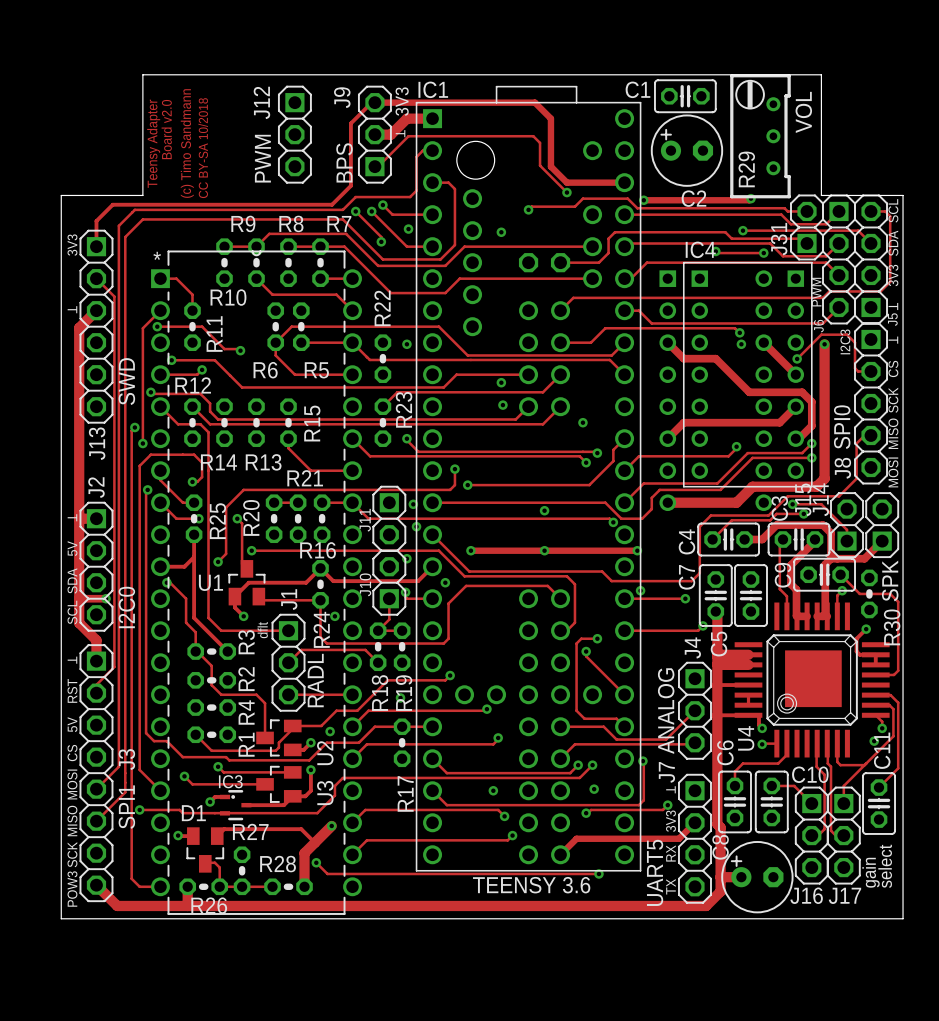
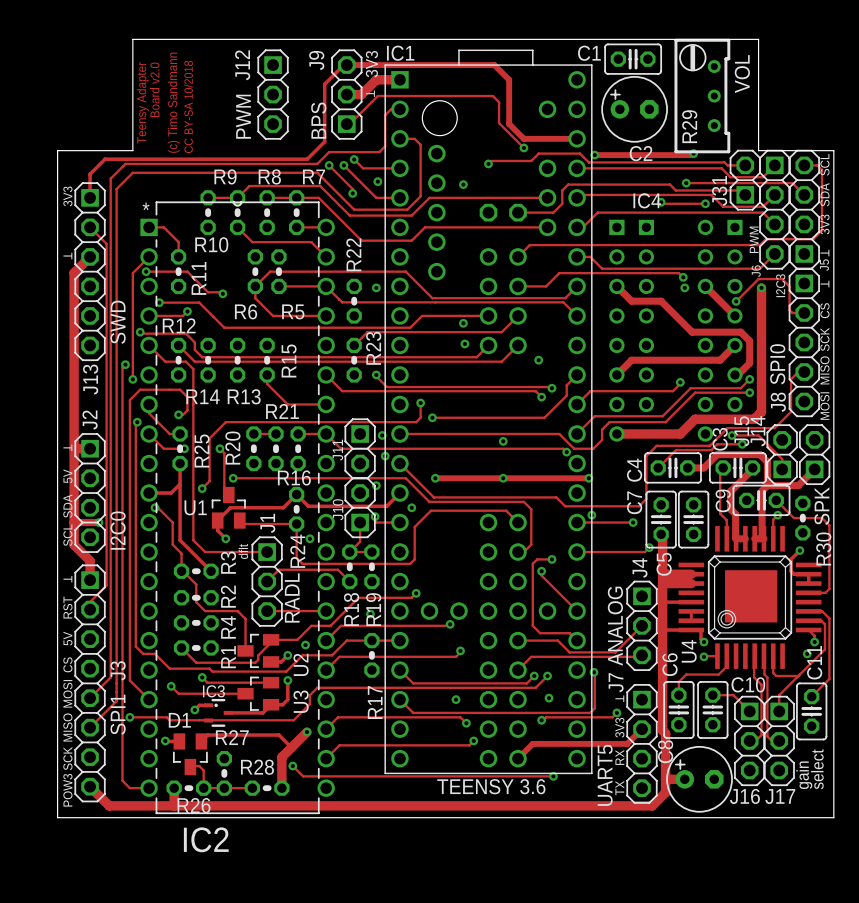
IC4 footprint: [682, 261, 813, 488] -> [638, 219, 743, 413]
IC2 name: none -> IC2 (206, 839)

